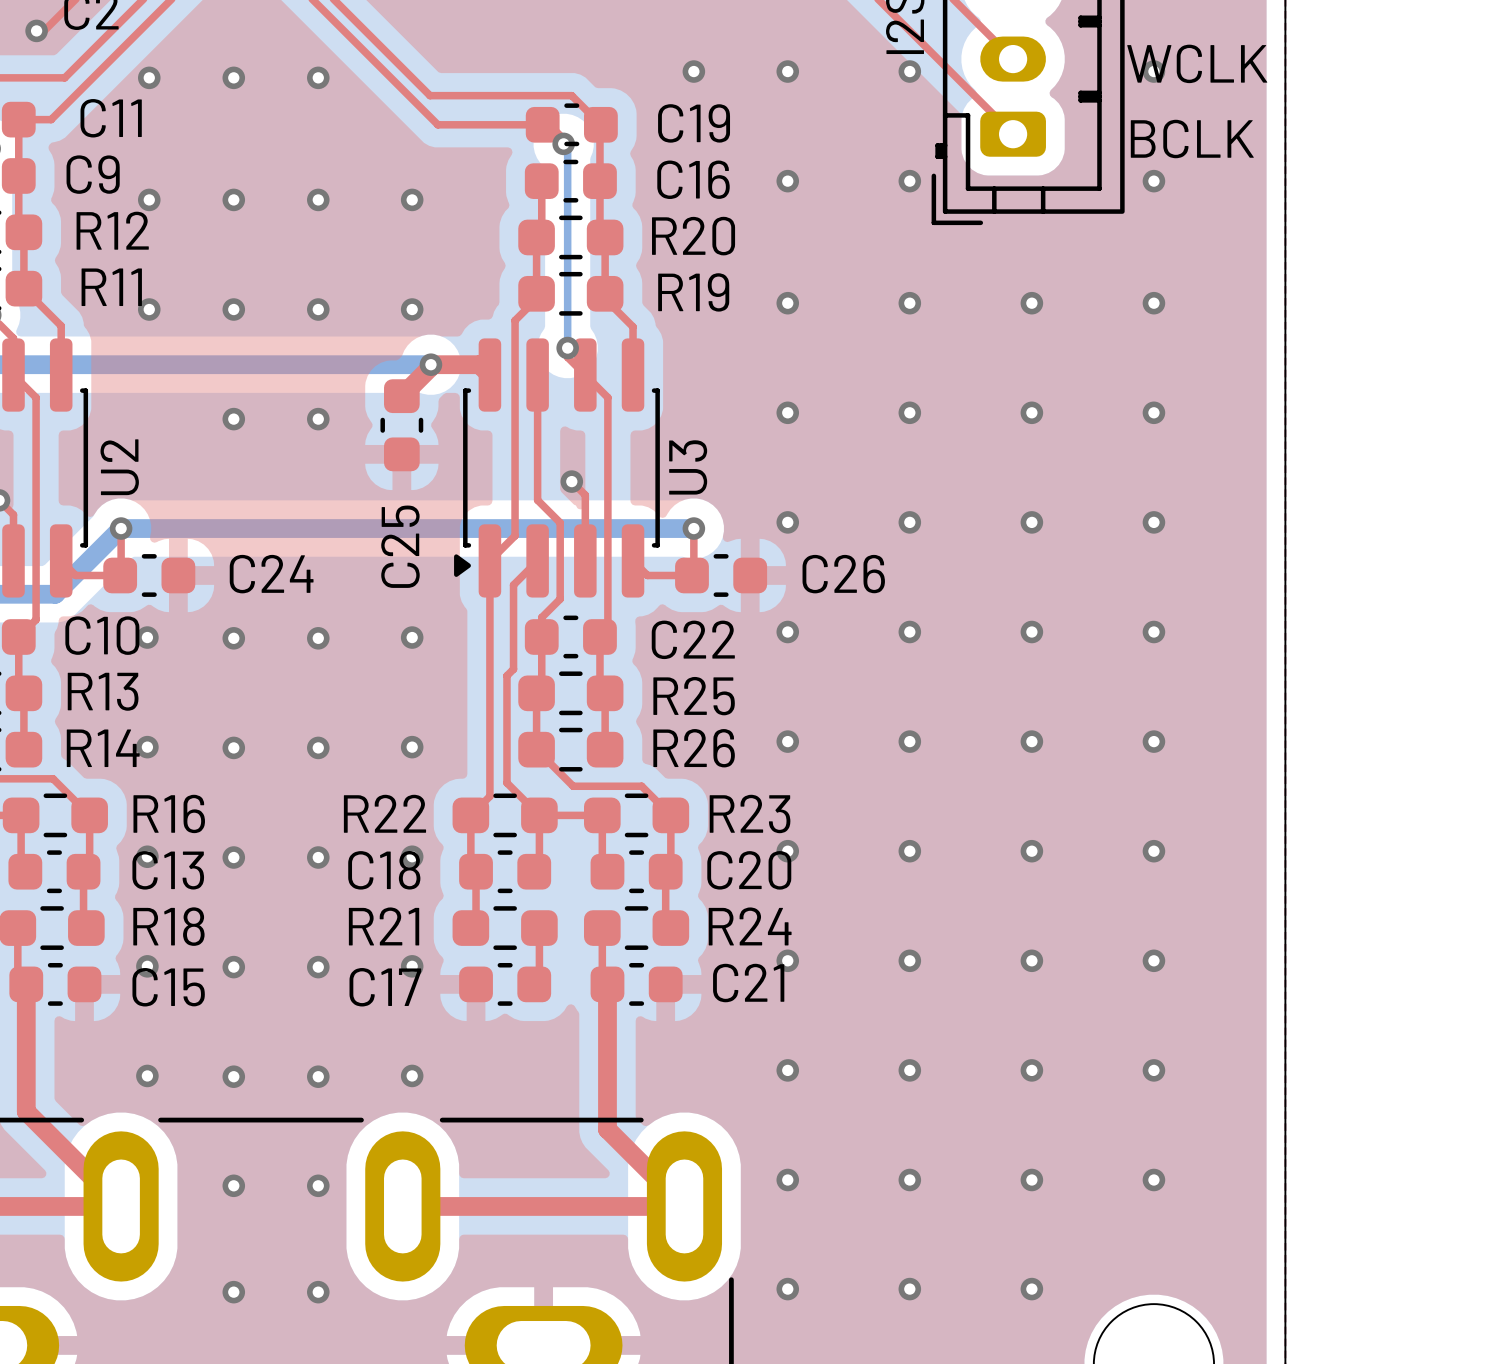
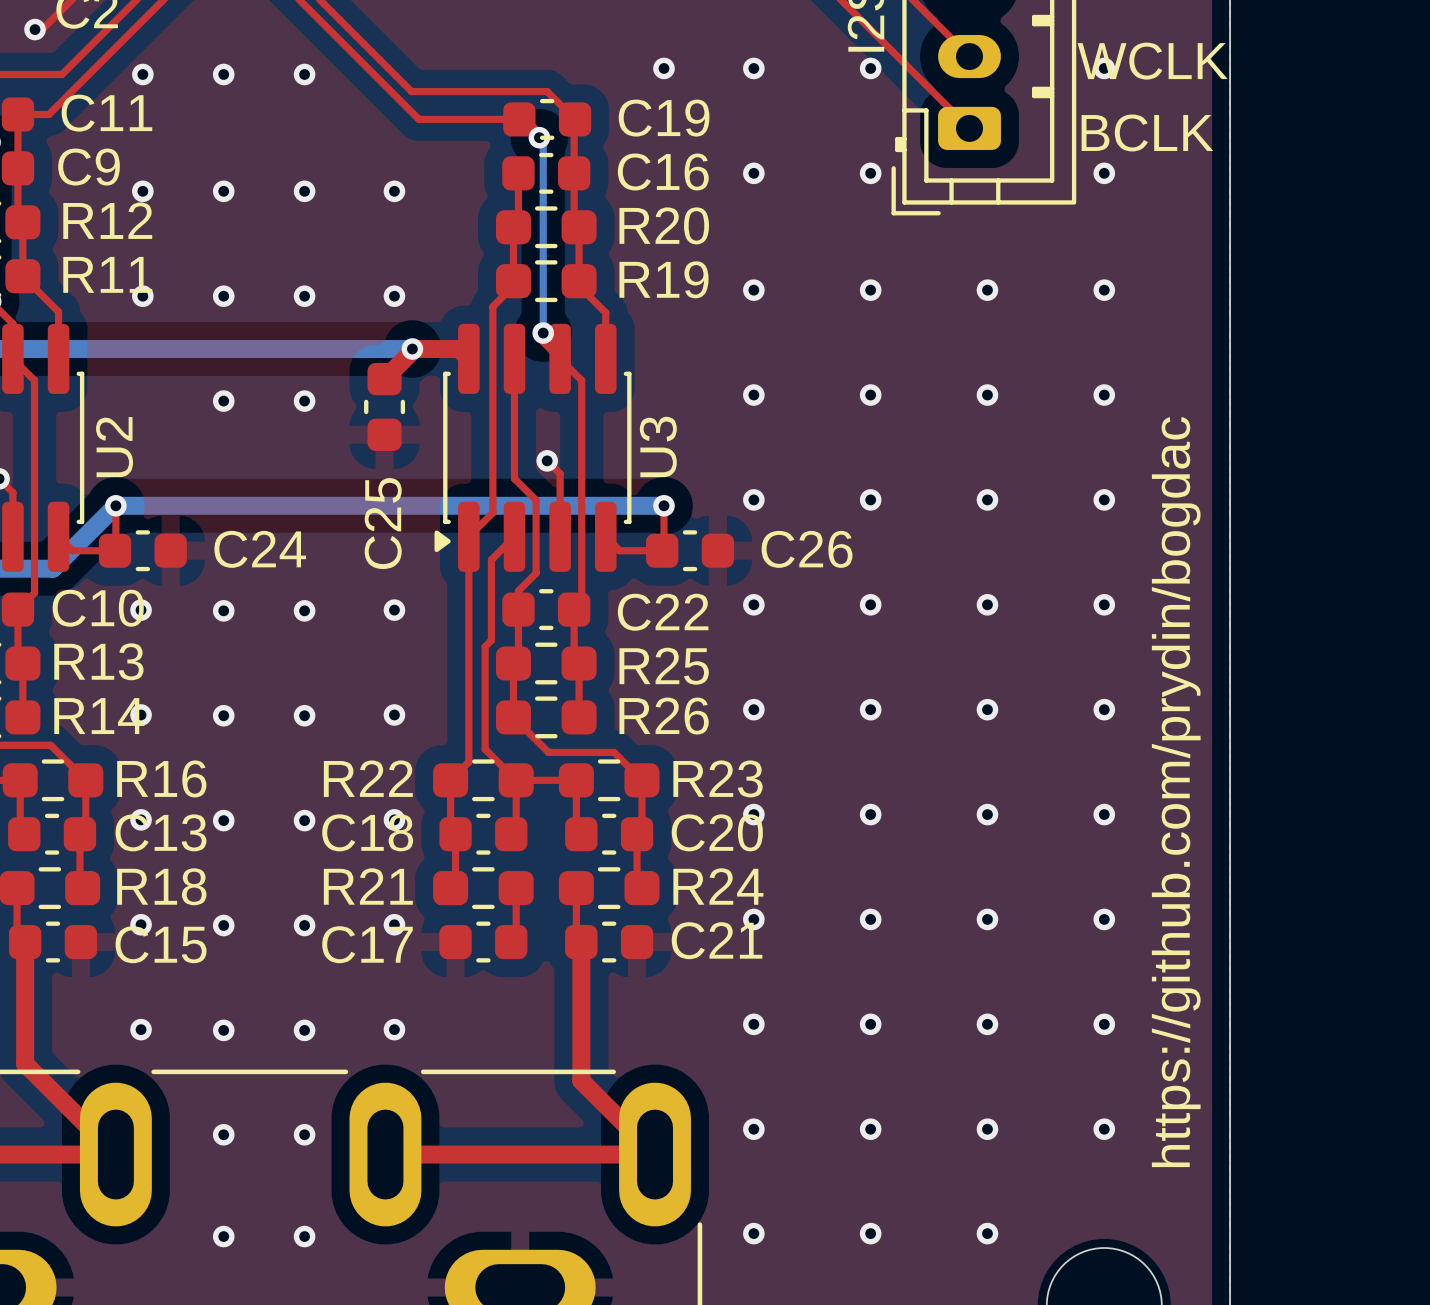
text: none -> https://github.com/prydin/bogdac (1176, 792)

